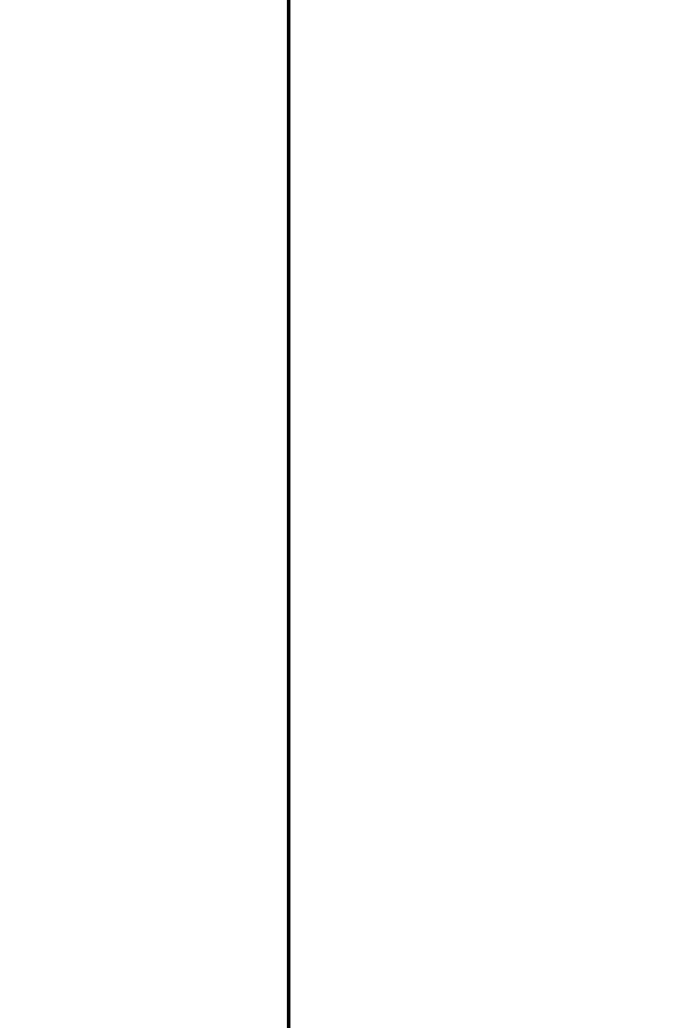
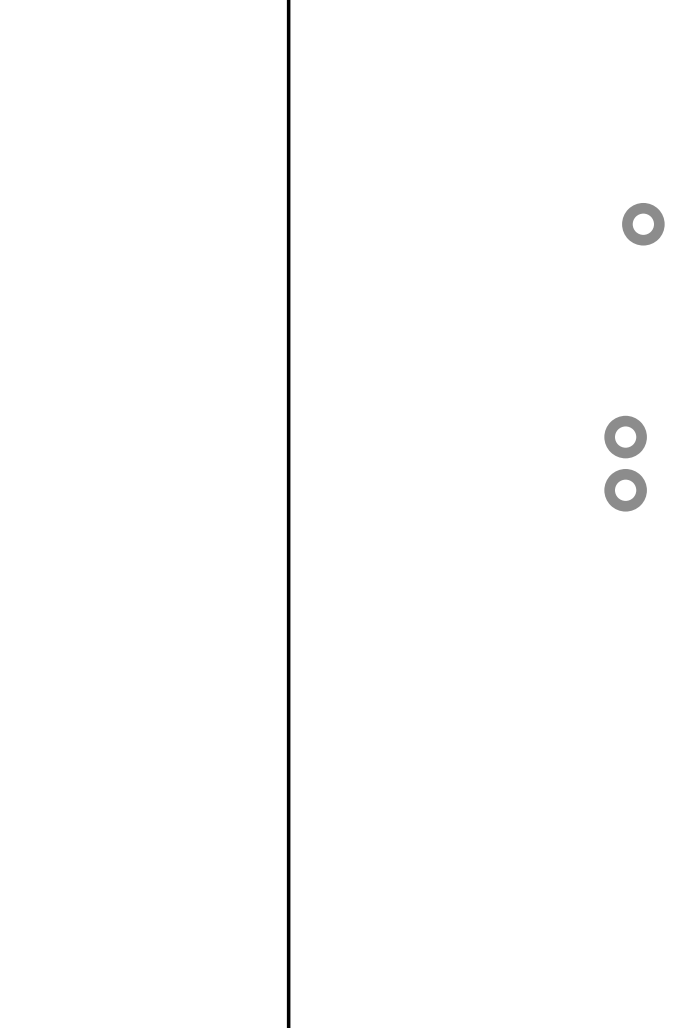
via: none -> (643, 224)
via: none -> (625, 437)
via: none -> (625, 490)

